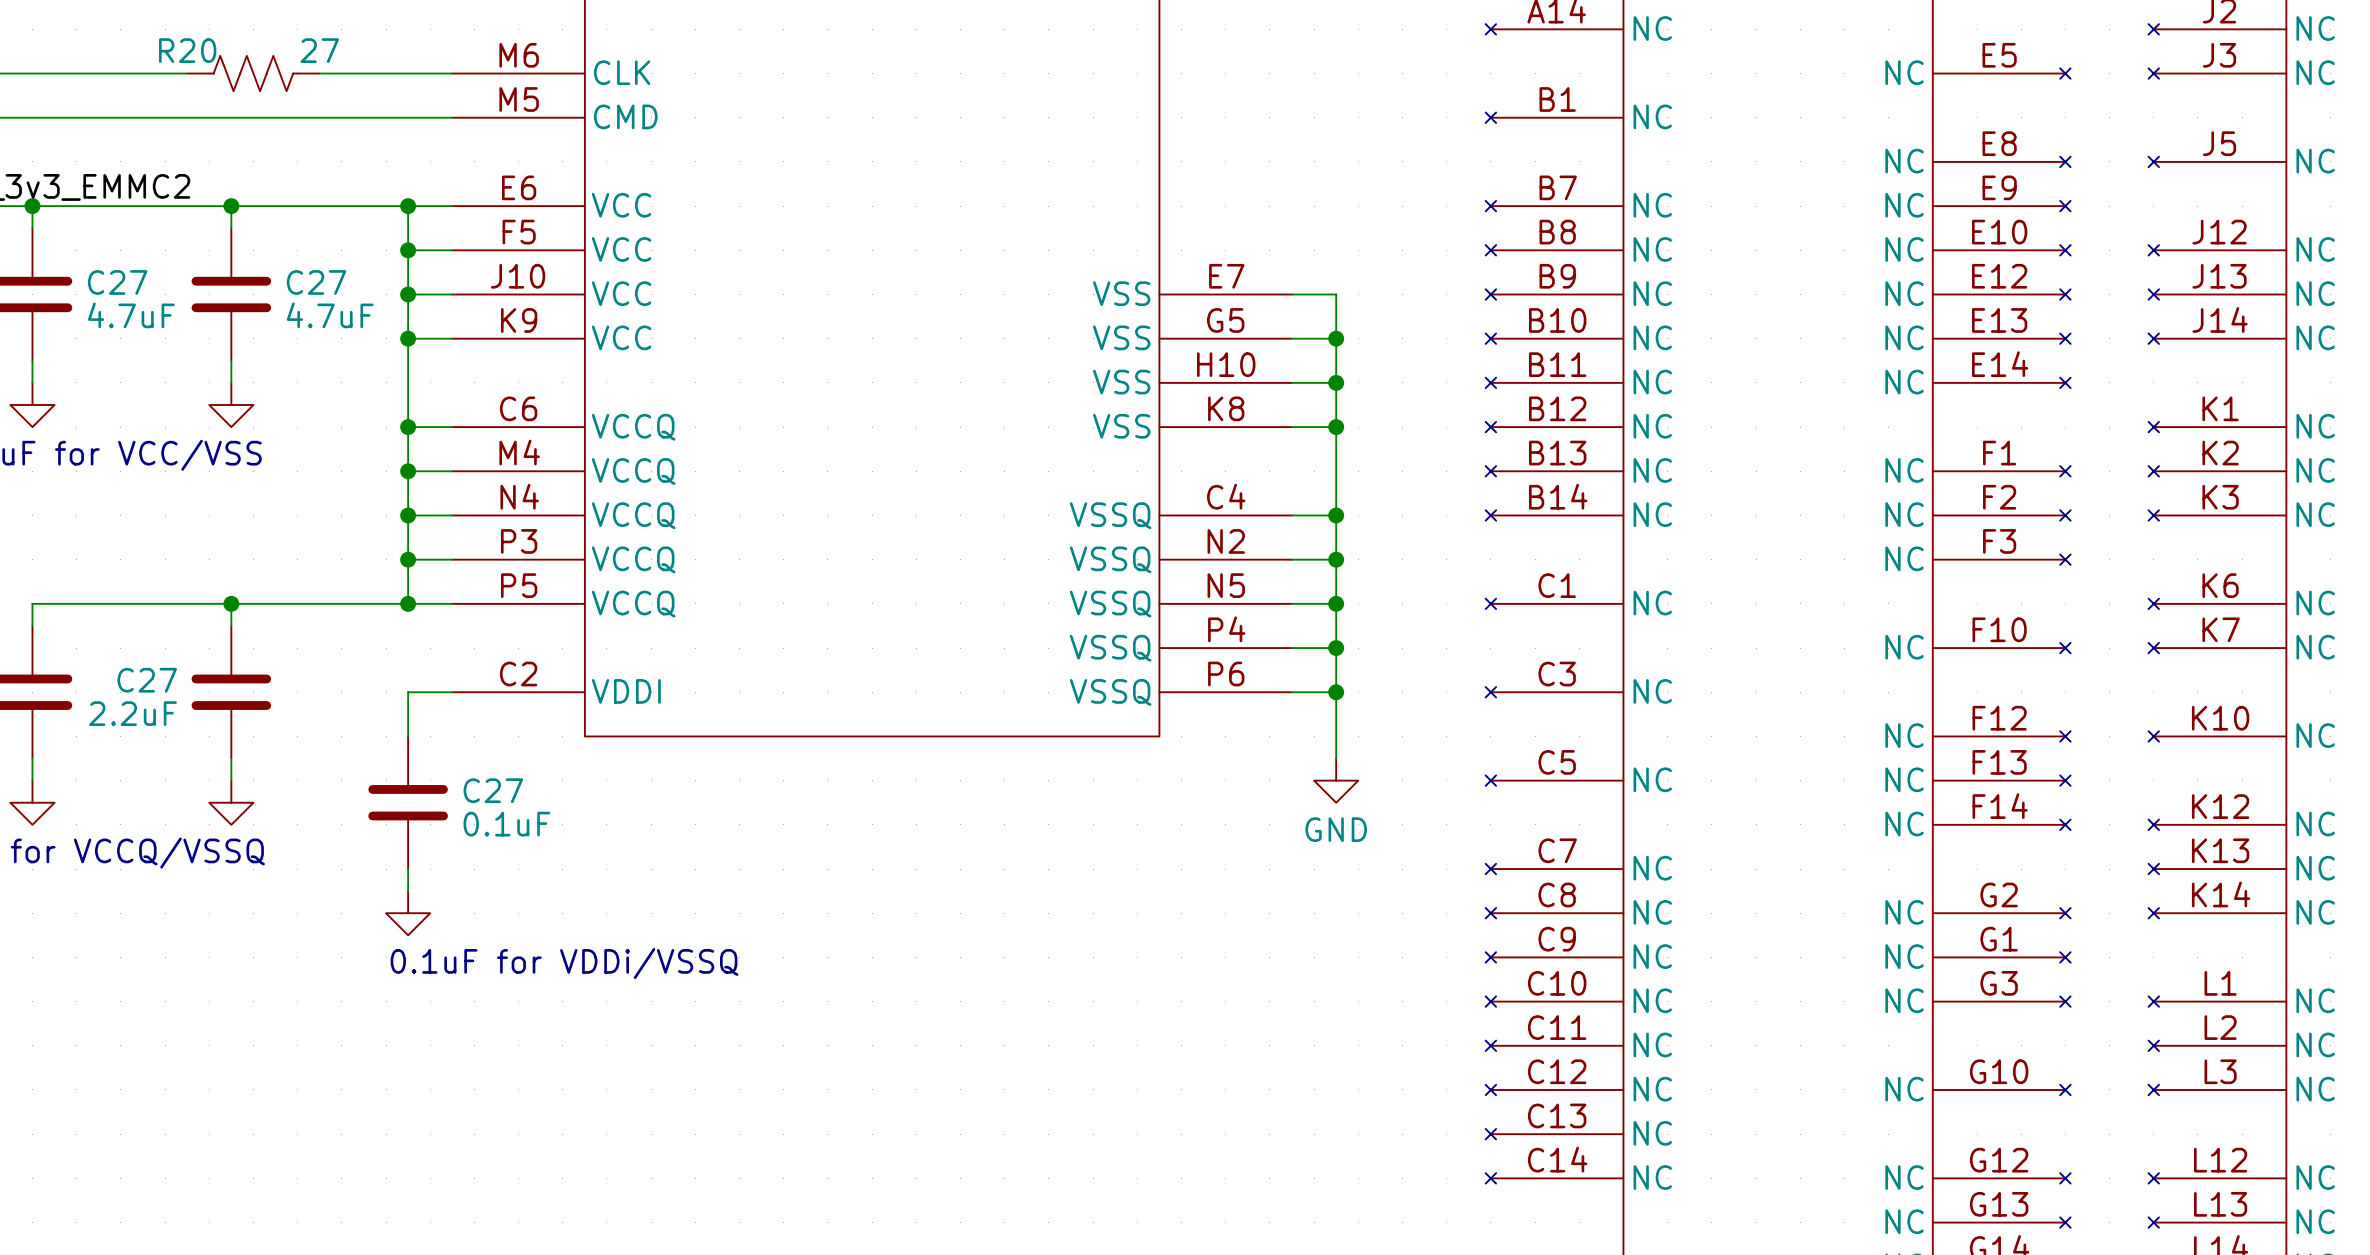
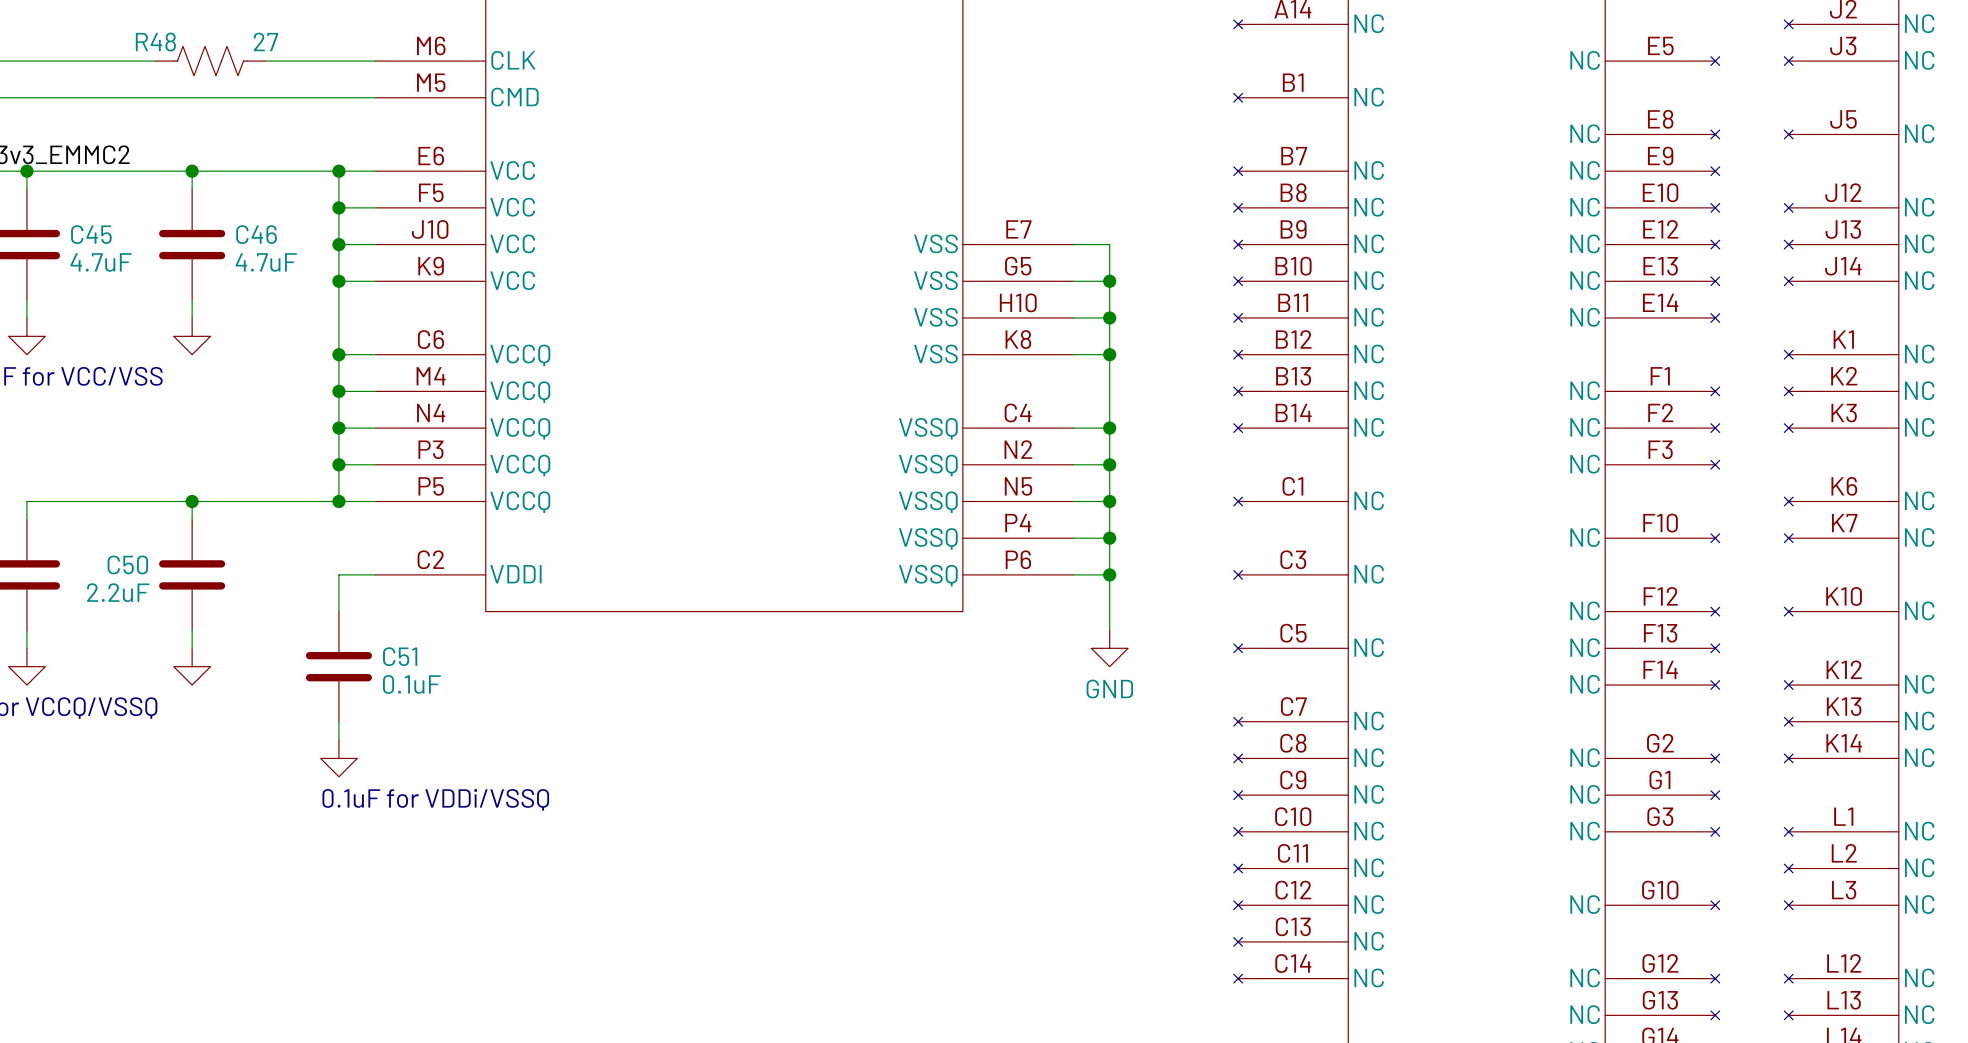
R20 name: R20 (187, 50) -> R48 (155, 42)
C27 name: C27 (117, 282) -> C45 (91, 234)
C27 name: C27 (316, 282) -> C46 (256, 234)
C27 name: C27 (147, 680) -> C50 (127, 564)
C27 name: C27 (493, 790) -> C51 (400, 656)

